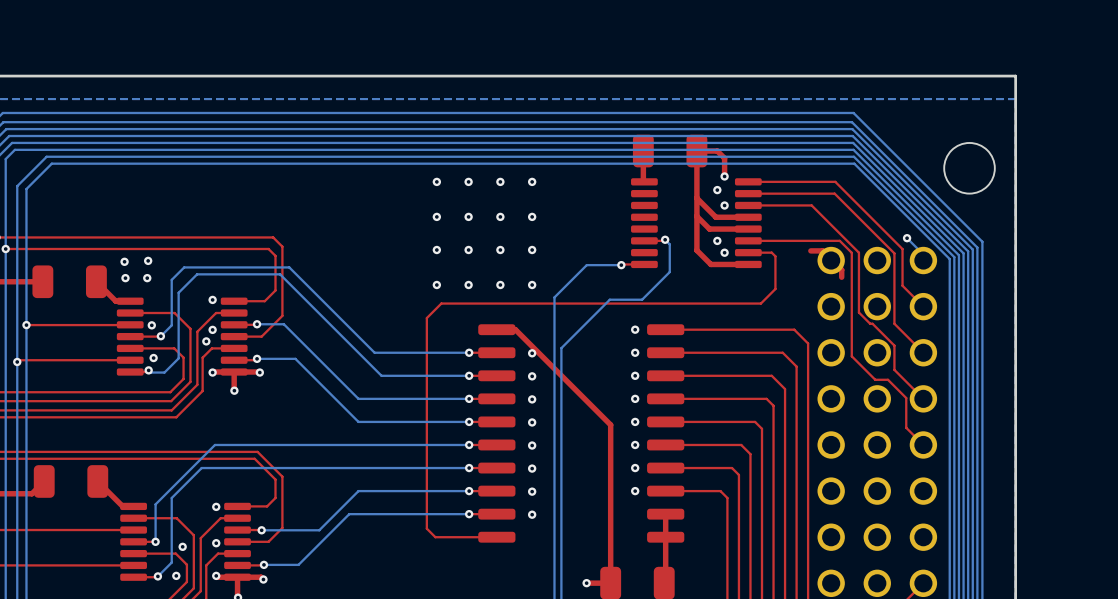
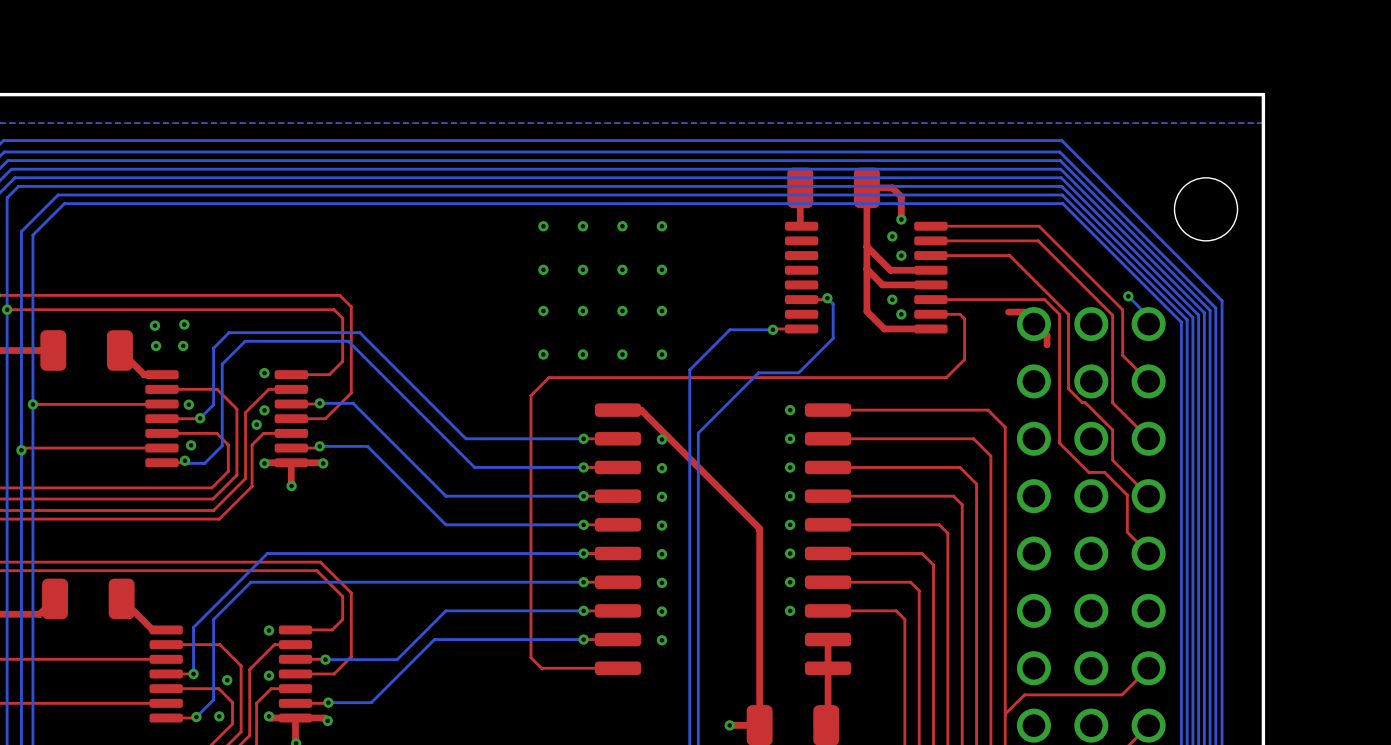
top track: none -> (1148, 668) (1122, 694) (1024, 694) (1005, 714)

